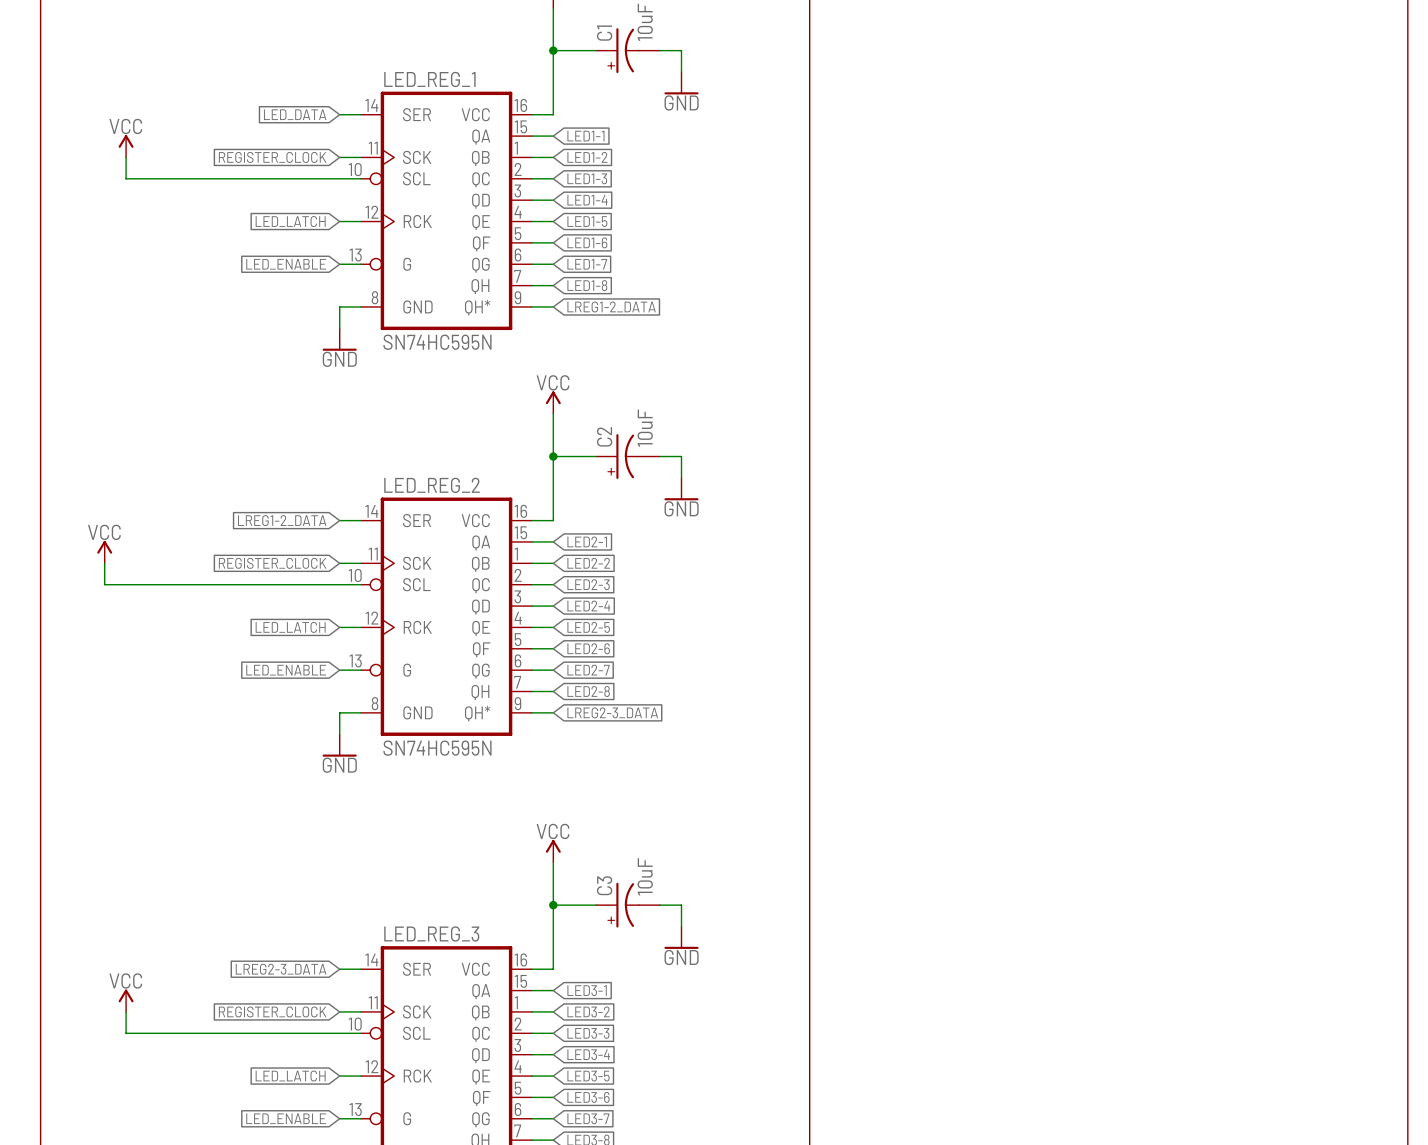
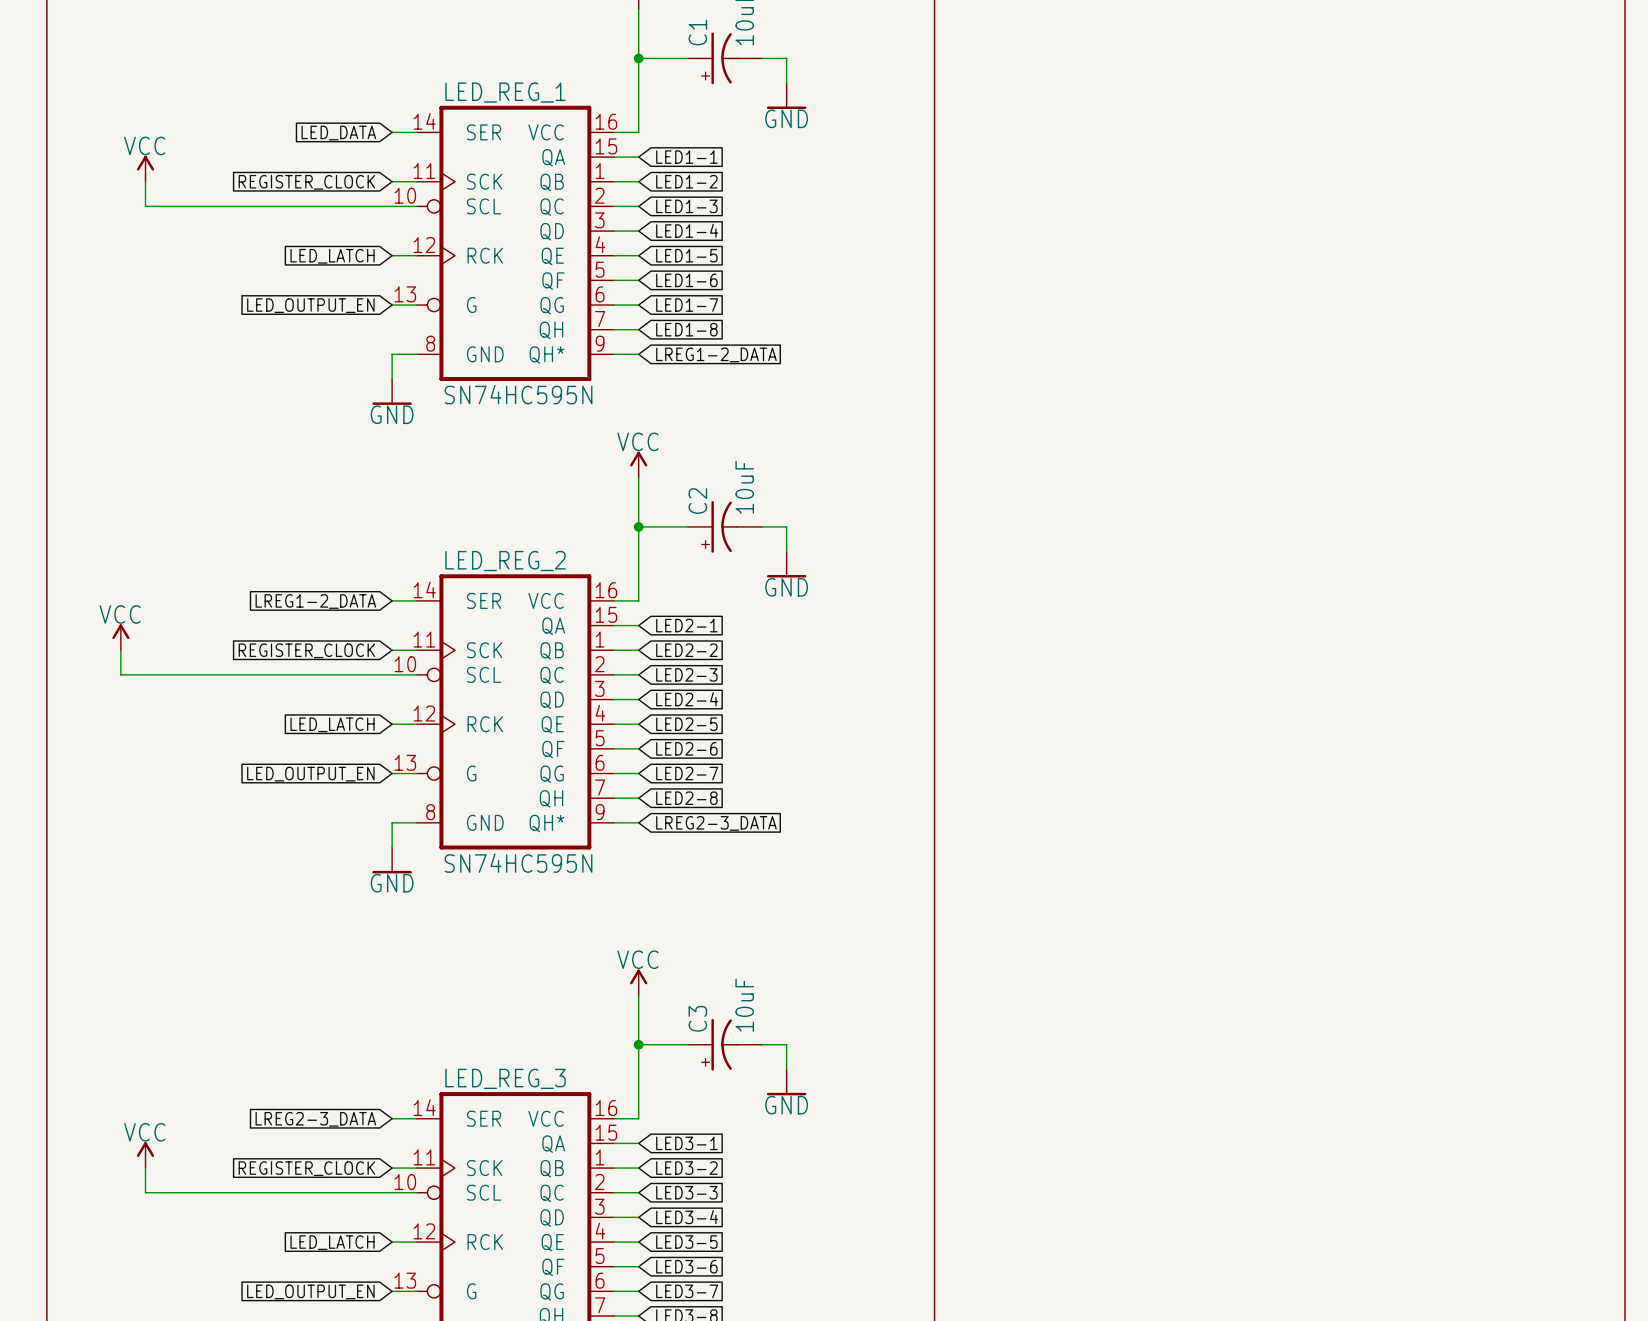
global label: LED_ENABLE (286, 264) -> LED_OUTPUT_EN (310, 305)
global label: LED_ENABLE (286, 670) -> LED_OUTPUT_EN (310, 774)
global label: LED_ENABLE (286, 1118) -> LED_OUTPUT_EN (310, 1291)

